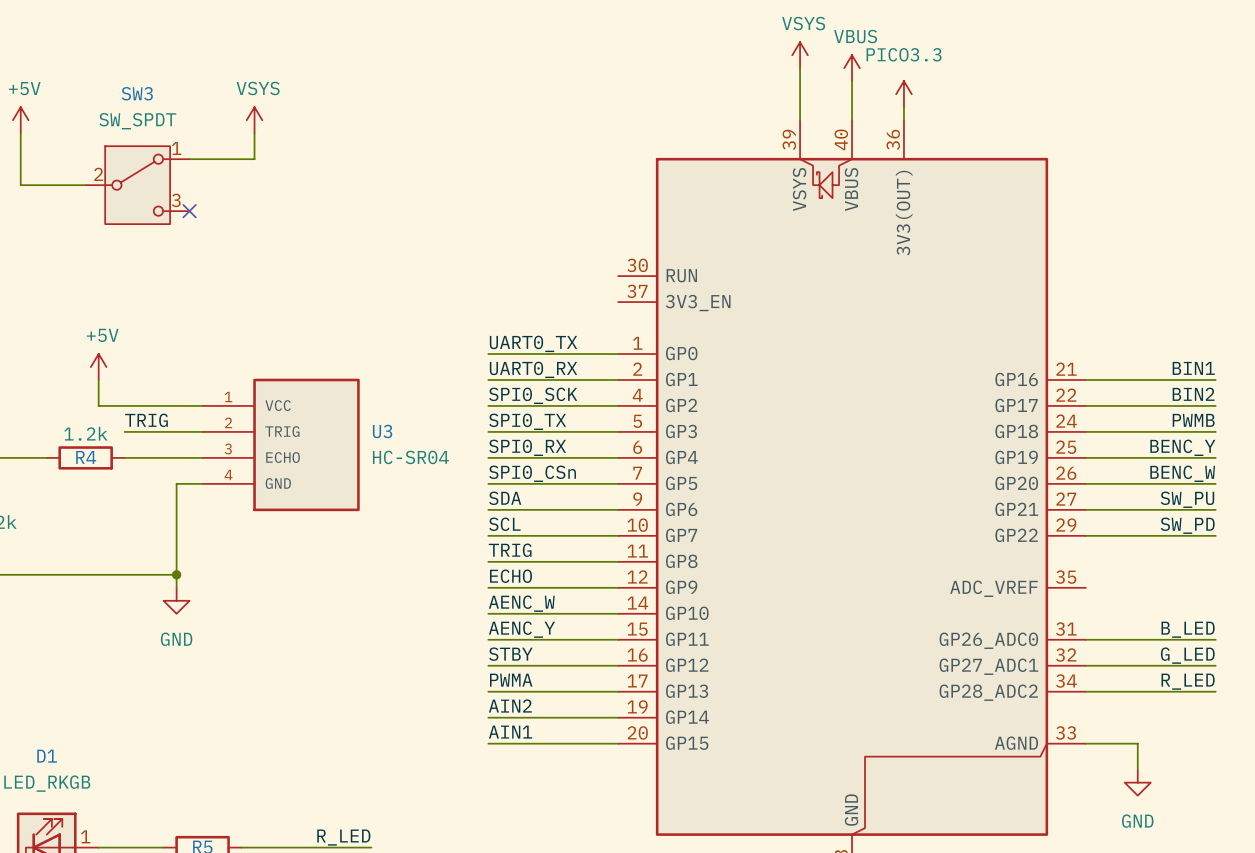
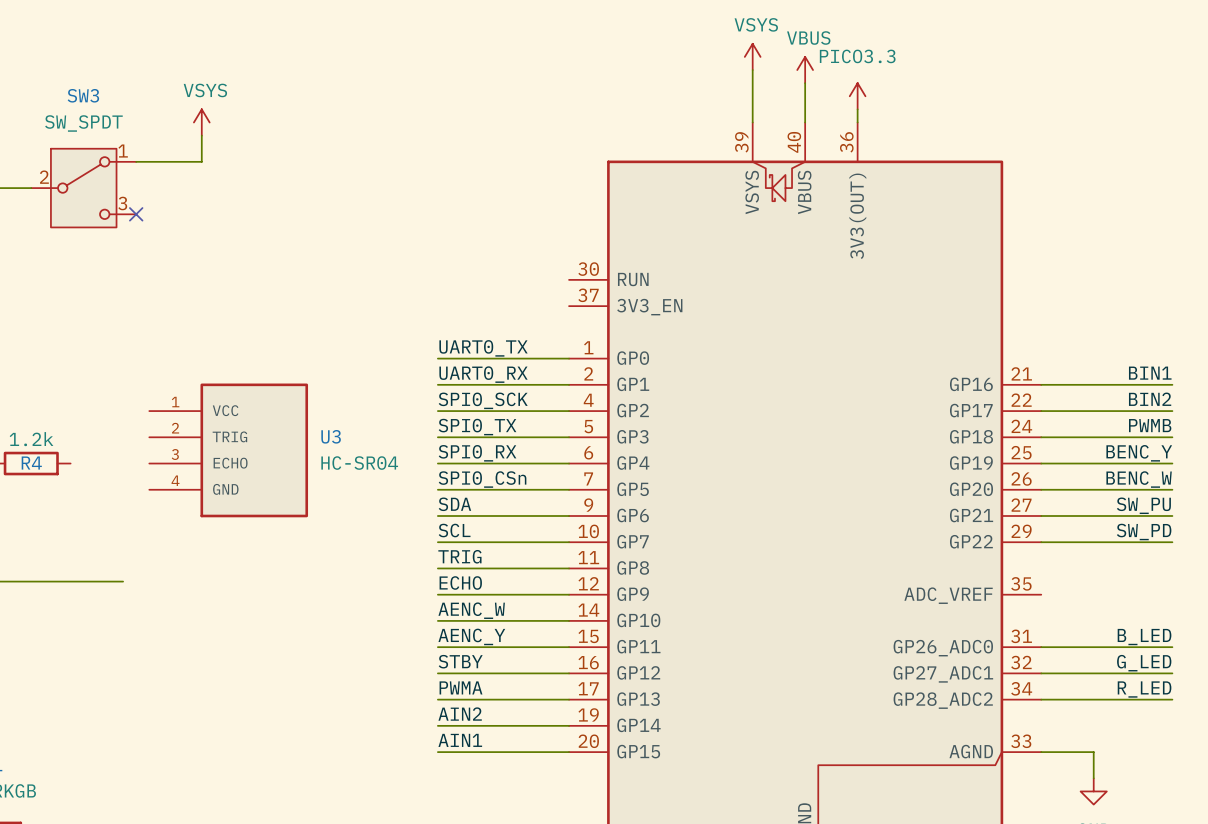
power symbol: +5V (98, 367) -> none
wire: (98, 379) (98, 405) (202, 405) -> none
label: TRIG (146, 420) -> none
wire: (124, 431) (202, 431) -> none
wire: (124, 457) (202, 457) -> none
wire: (202, 483) (176, 483) (176, 587) -> none
junction: (176, 574) -> none
power symbol: GND (176, 600) -> none

